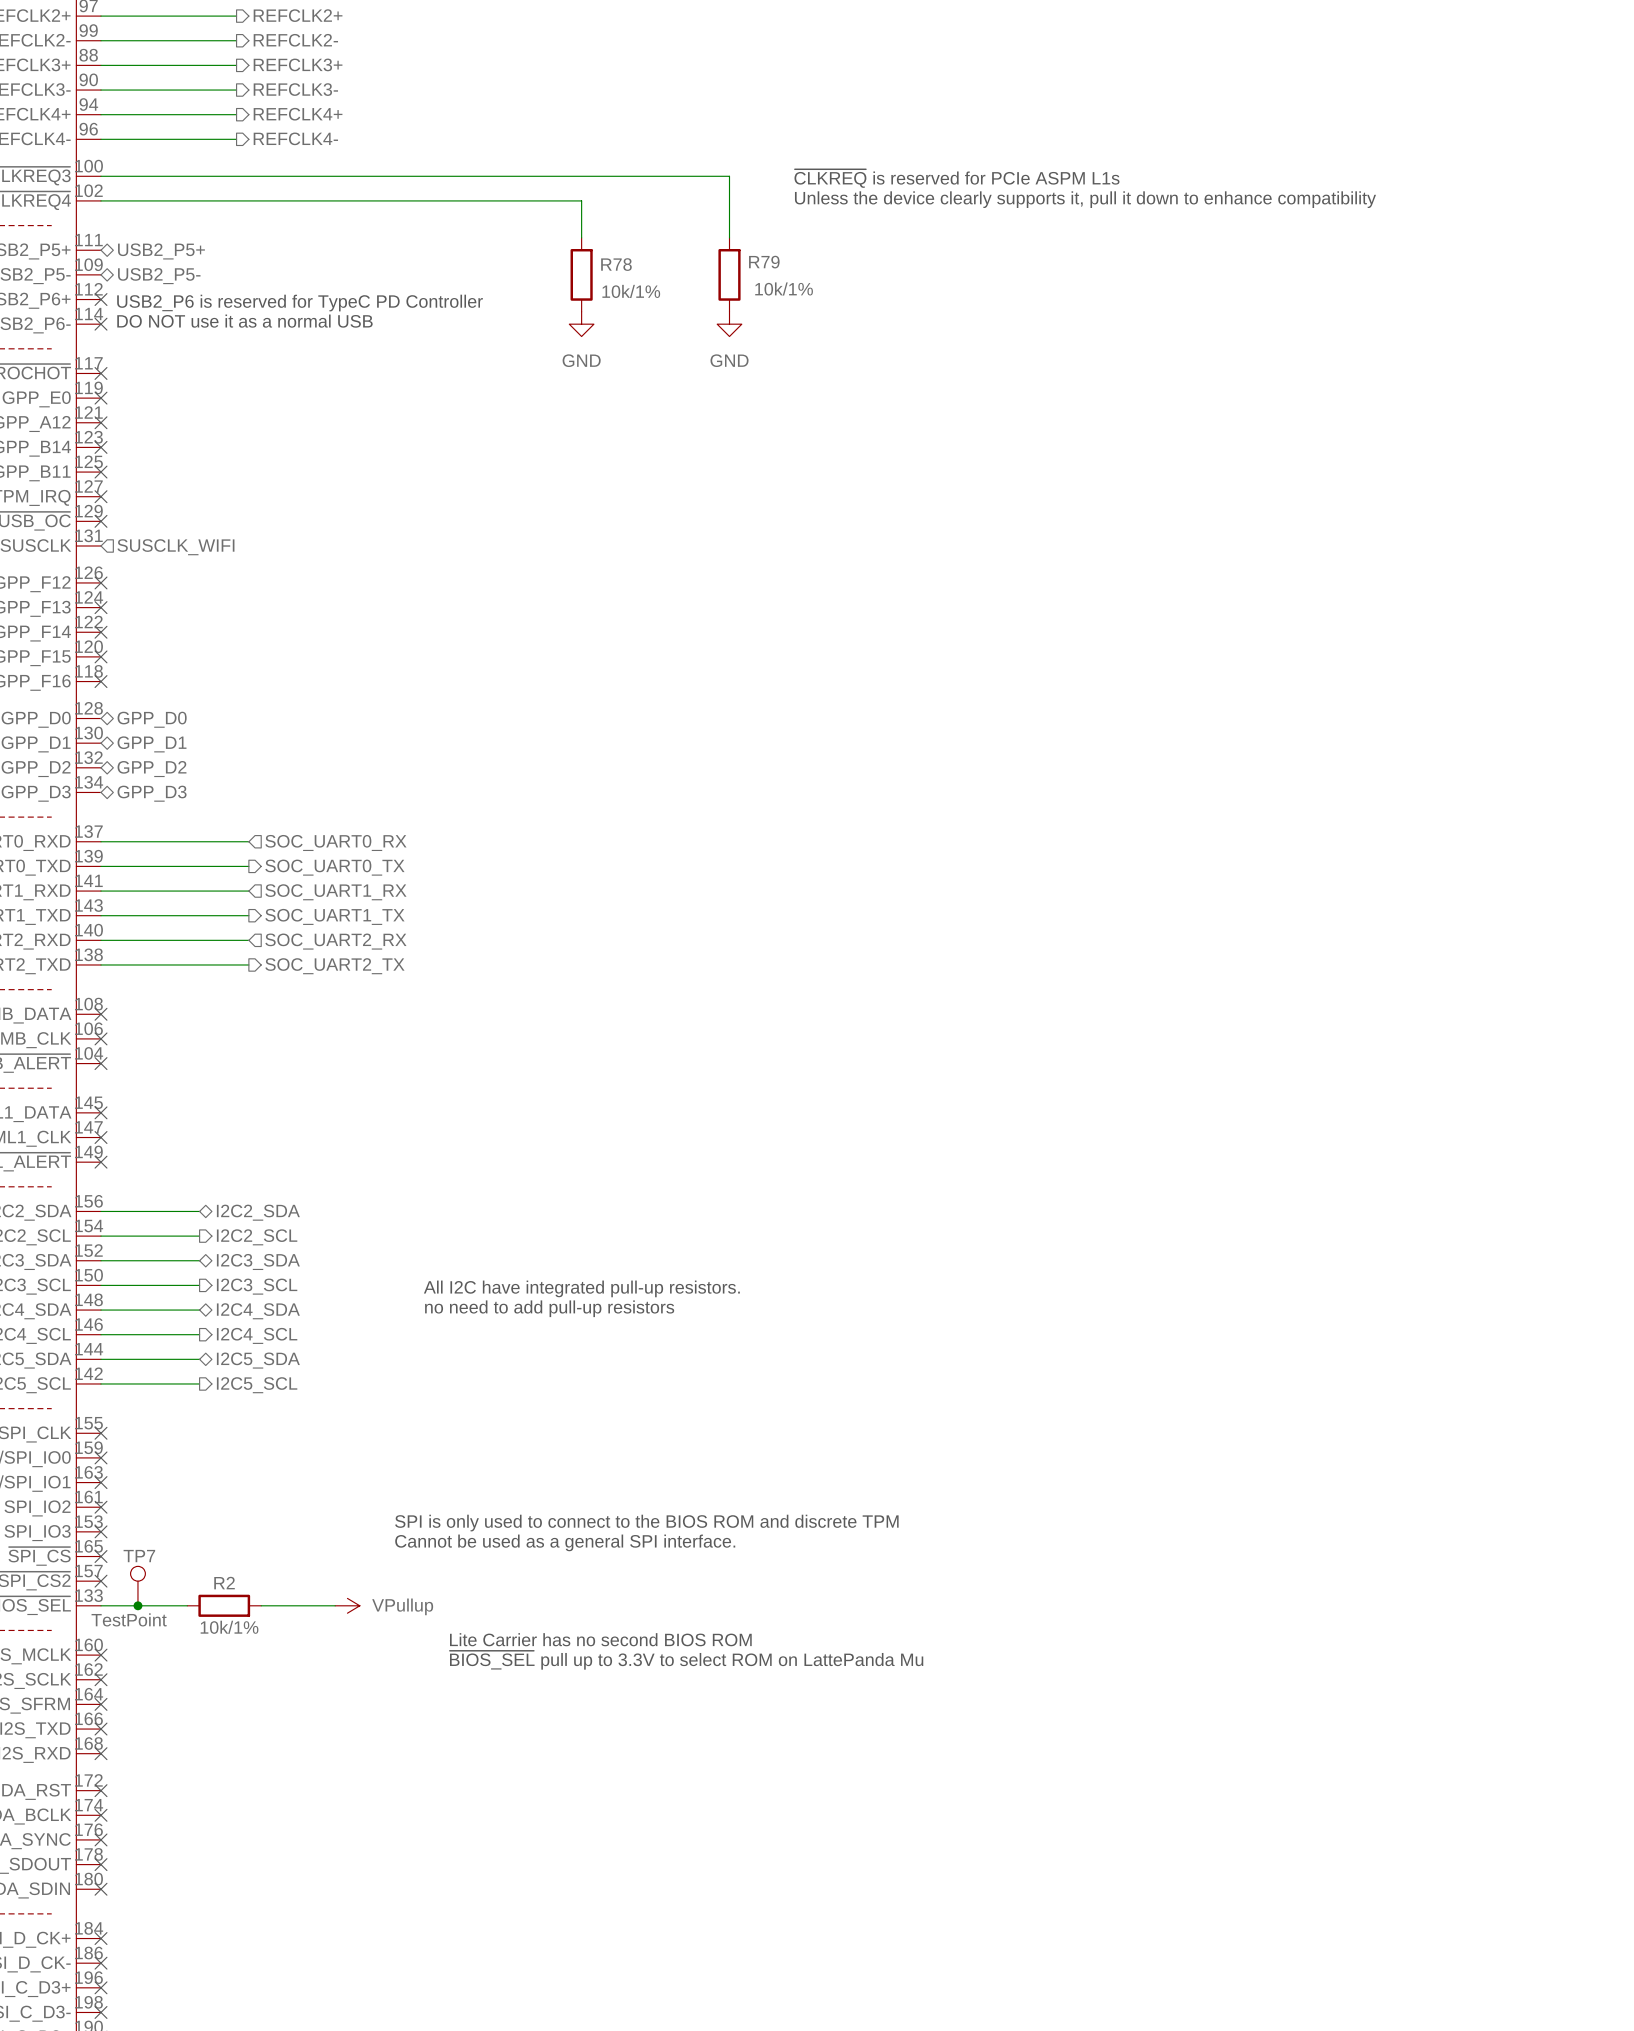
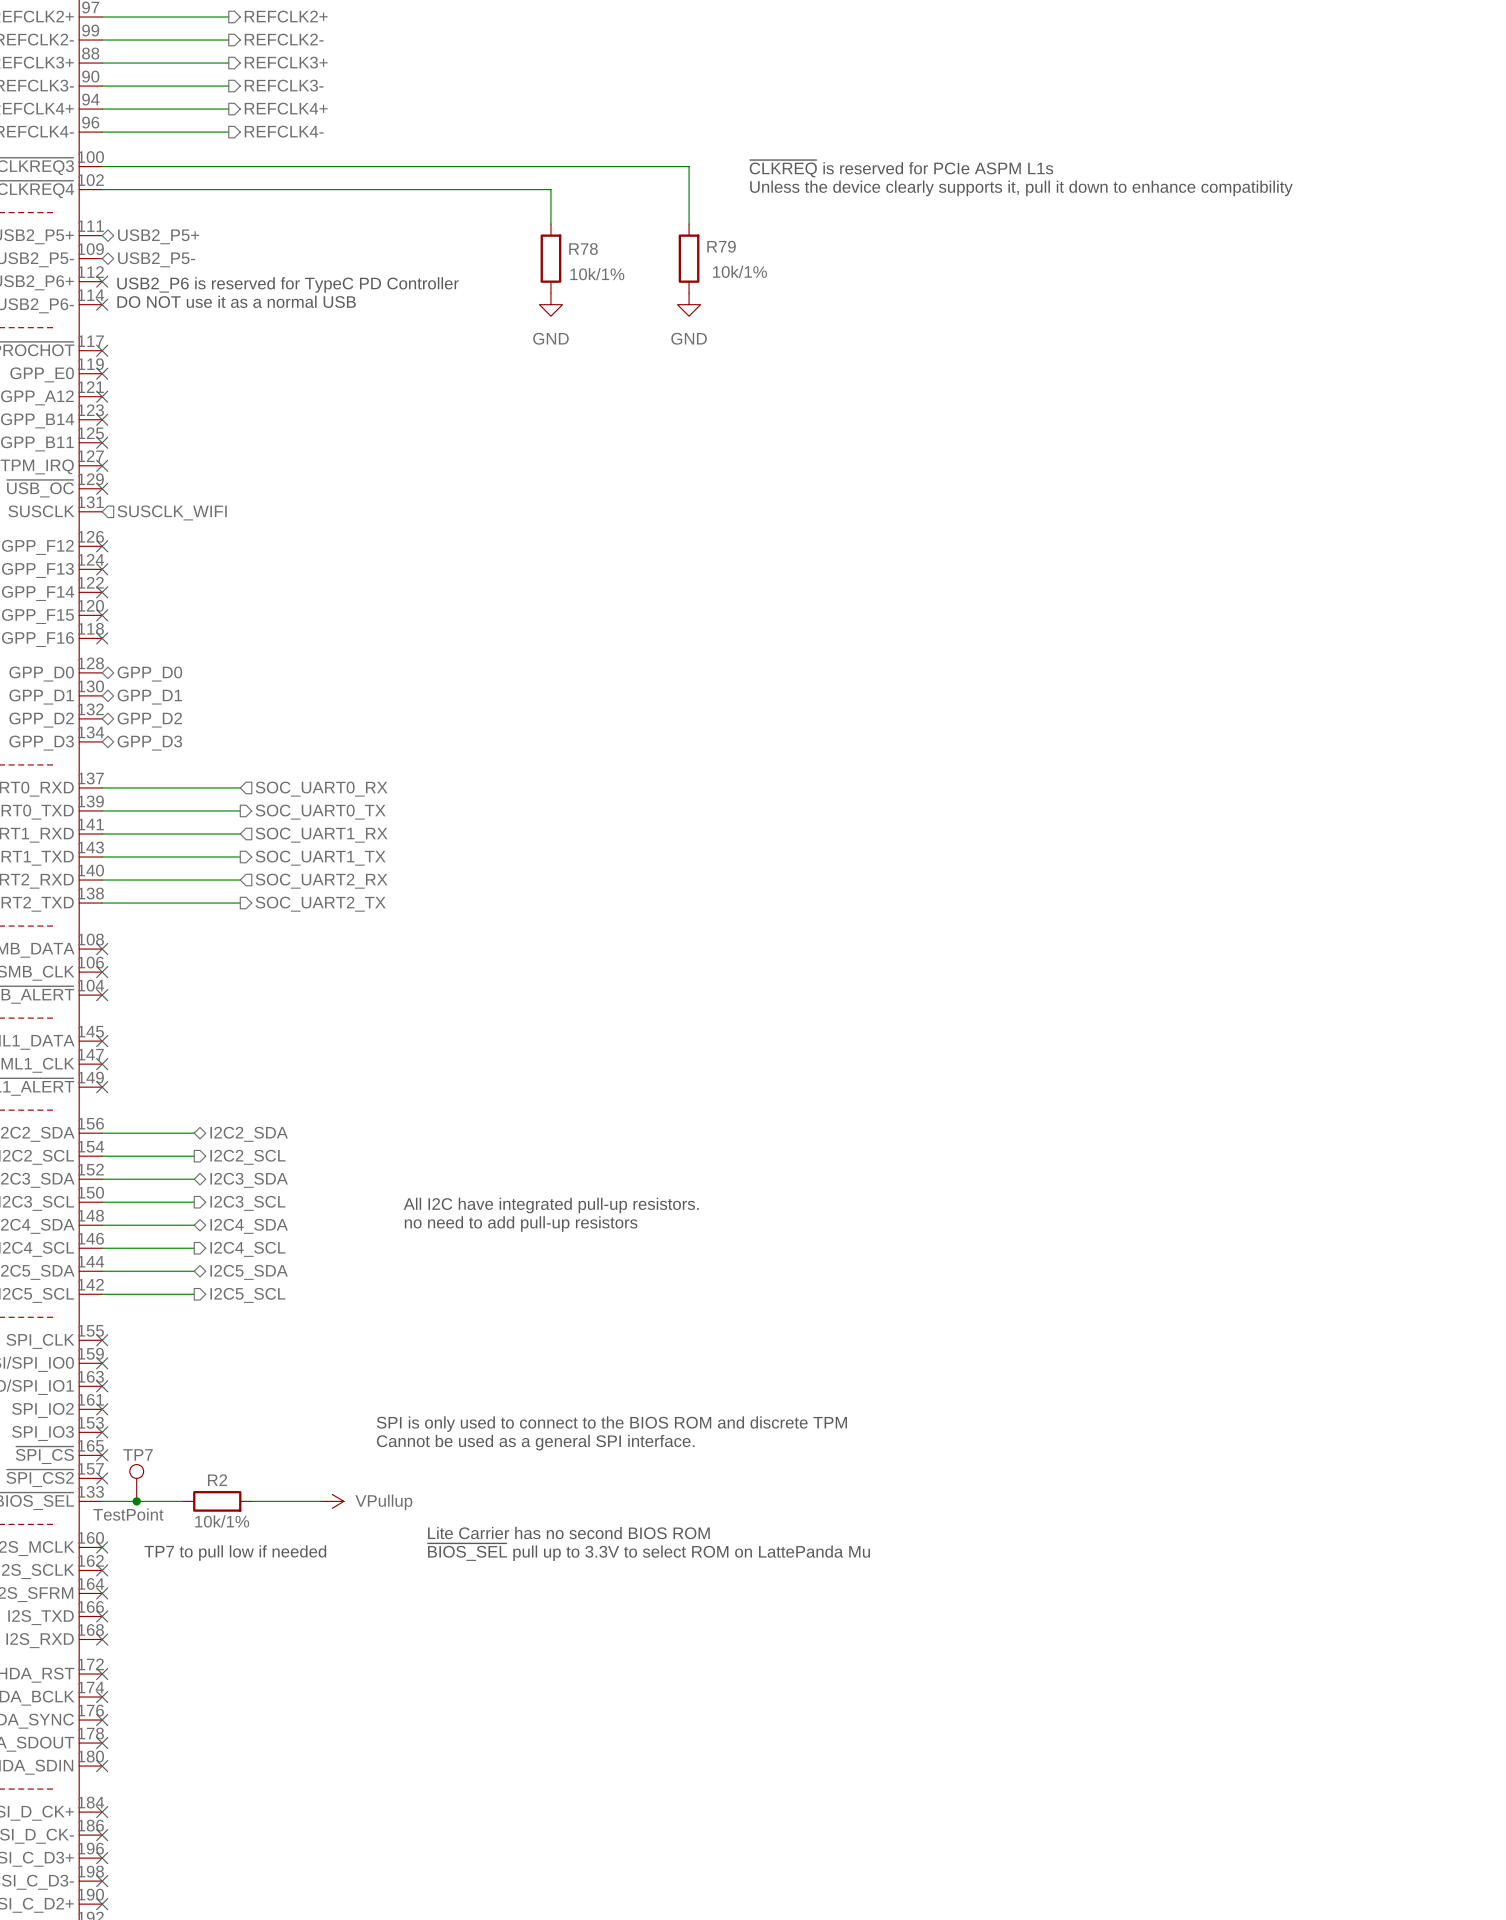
text: none -> TP7 to pull low if needed (235, 1553)

